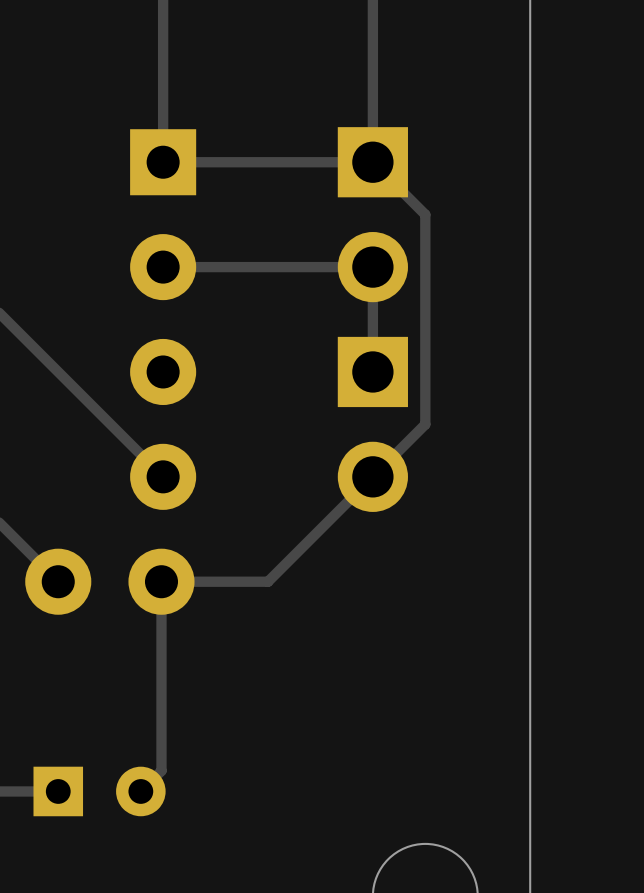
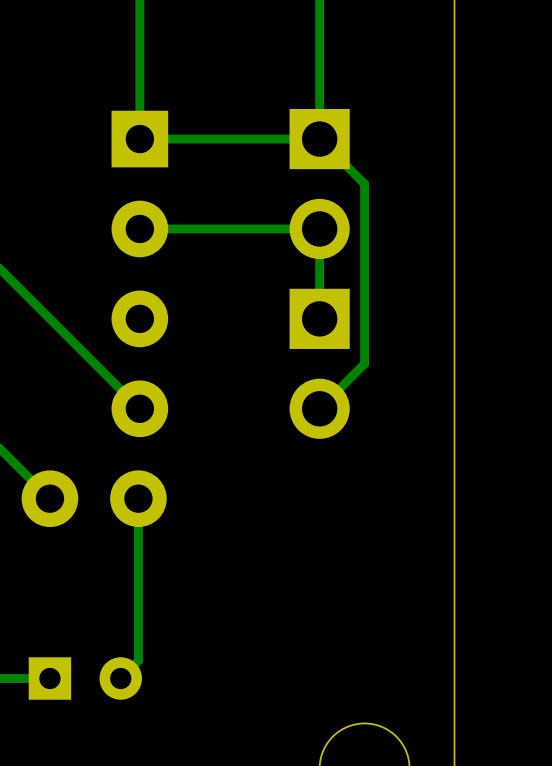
track: (372, 476) (268, 581) (161, 581) -> none

